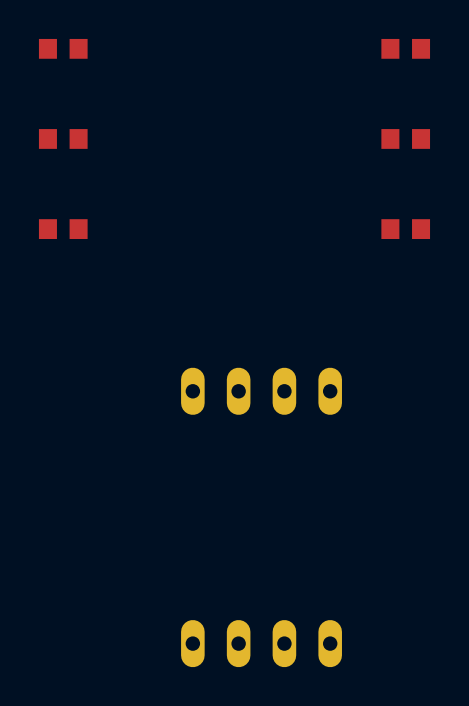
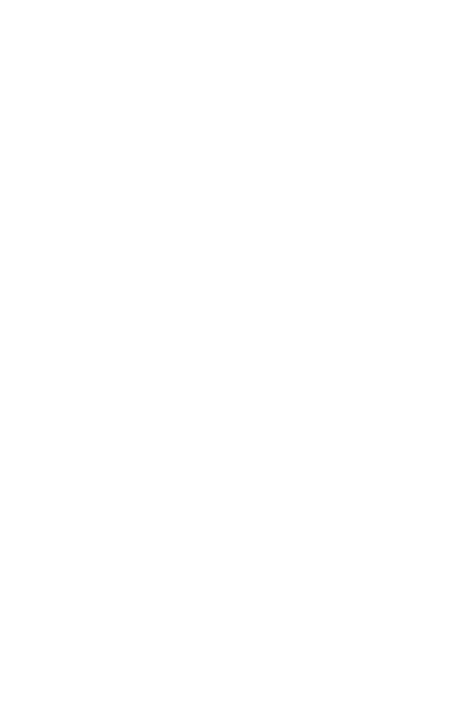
part: (63, 48) -> none
part: (405, 48) -> none
part: (63, 138) -> none
part: (405, 138) -> none
part: (63, 229) -> none
part: (405, 229) -> none
part: (261, 391) -> none
part: (261, 643) -> none

